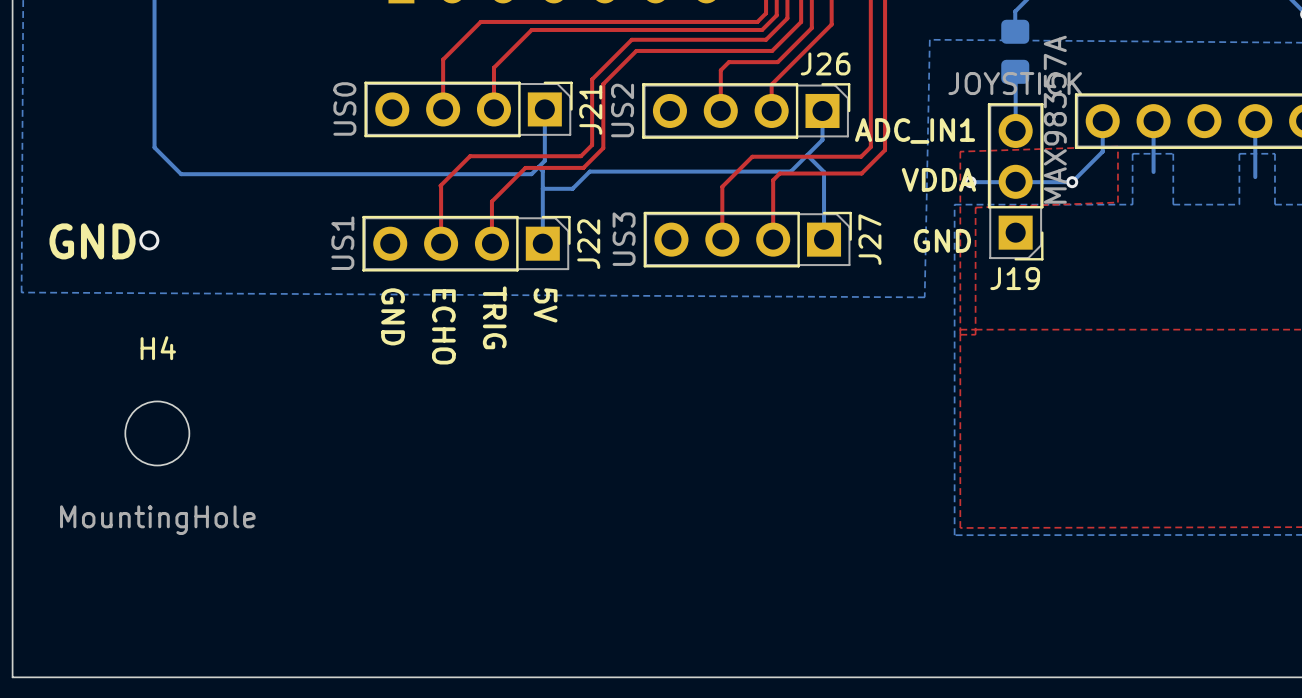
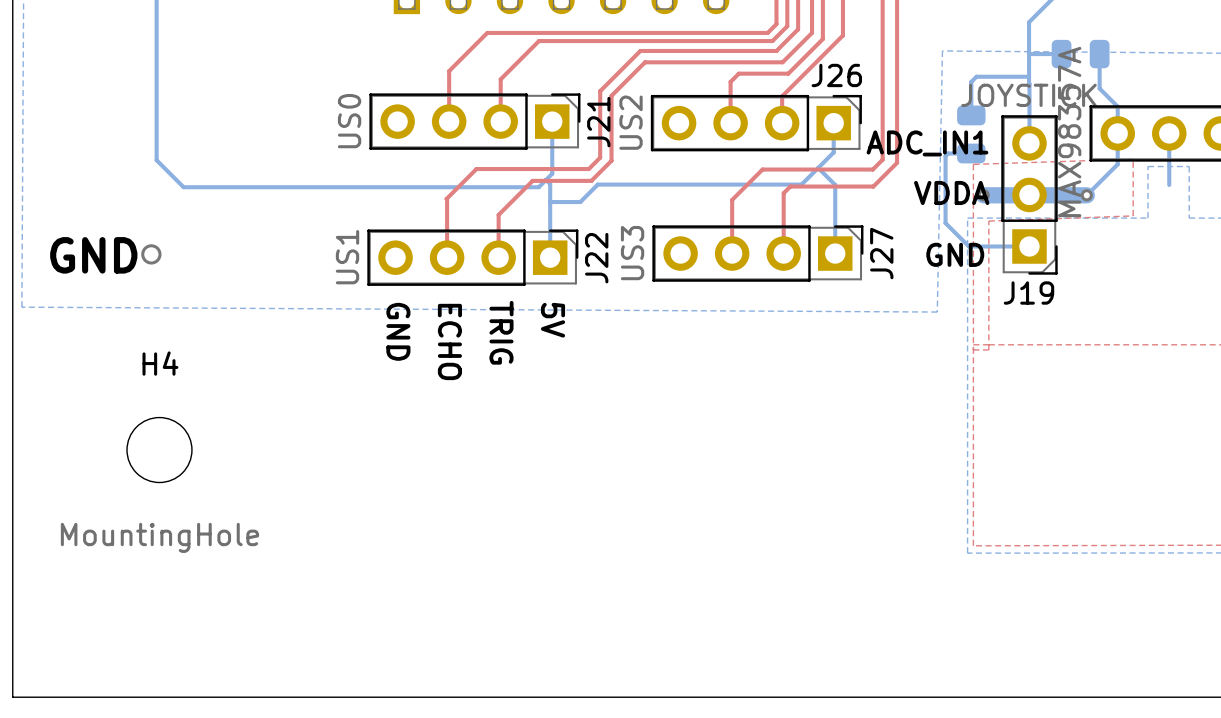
bottom track: none -> (1029, 42) (1029, 83)
bottom track: none -> (1029, 53) (1061, 54)
part: none -> (1080, 54)
bottom track: none -> (1099, 54) (1099, 88) (1117, 106) (1117, 133)
part: (1015, 51) -> none
bottom track: none -> (1029, 76) (976, 76) (971, 81) (971, 115)
part: none -> (971, 134)
bottom track: none -> (971, 153) (948, 153) (945, 156) (945, 223) (968, 246) (1029, 246)
bottom track width: thin (970, 182) (1072, 182) -> thick (983, 195) (1086, 195)

